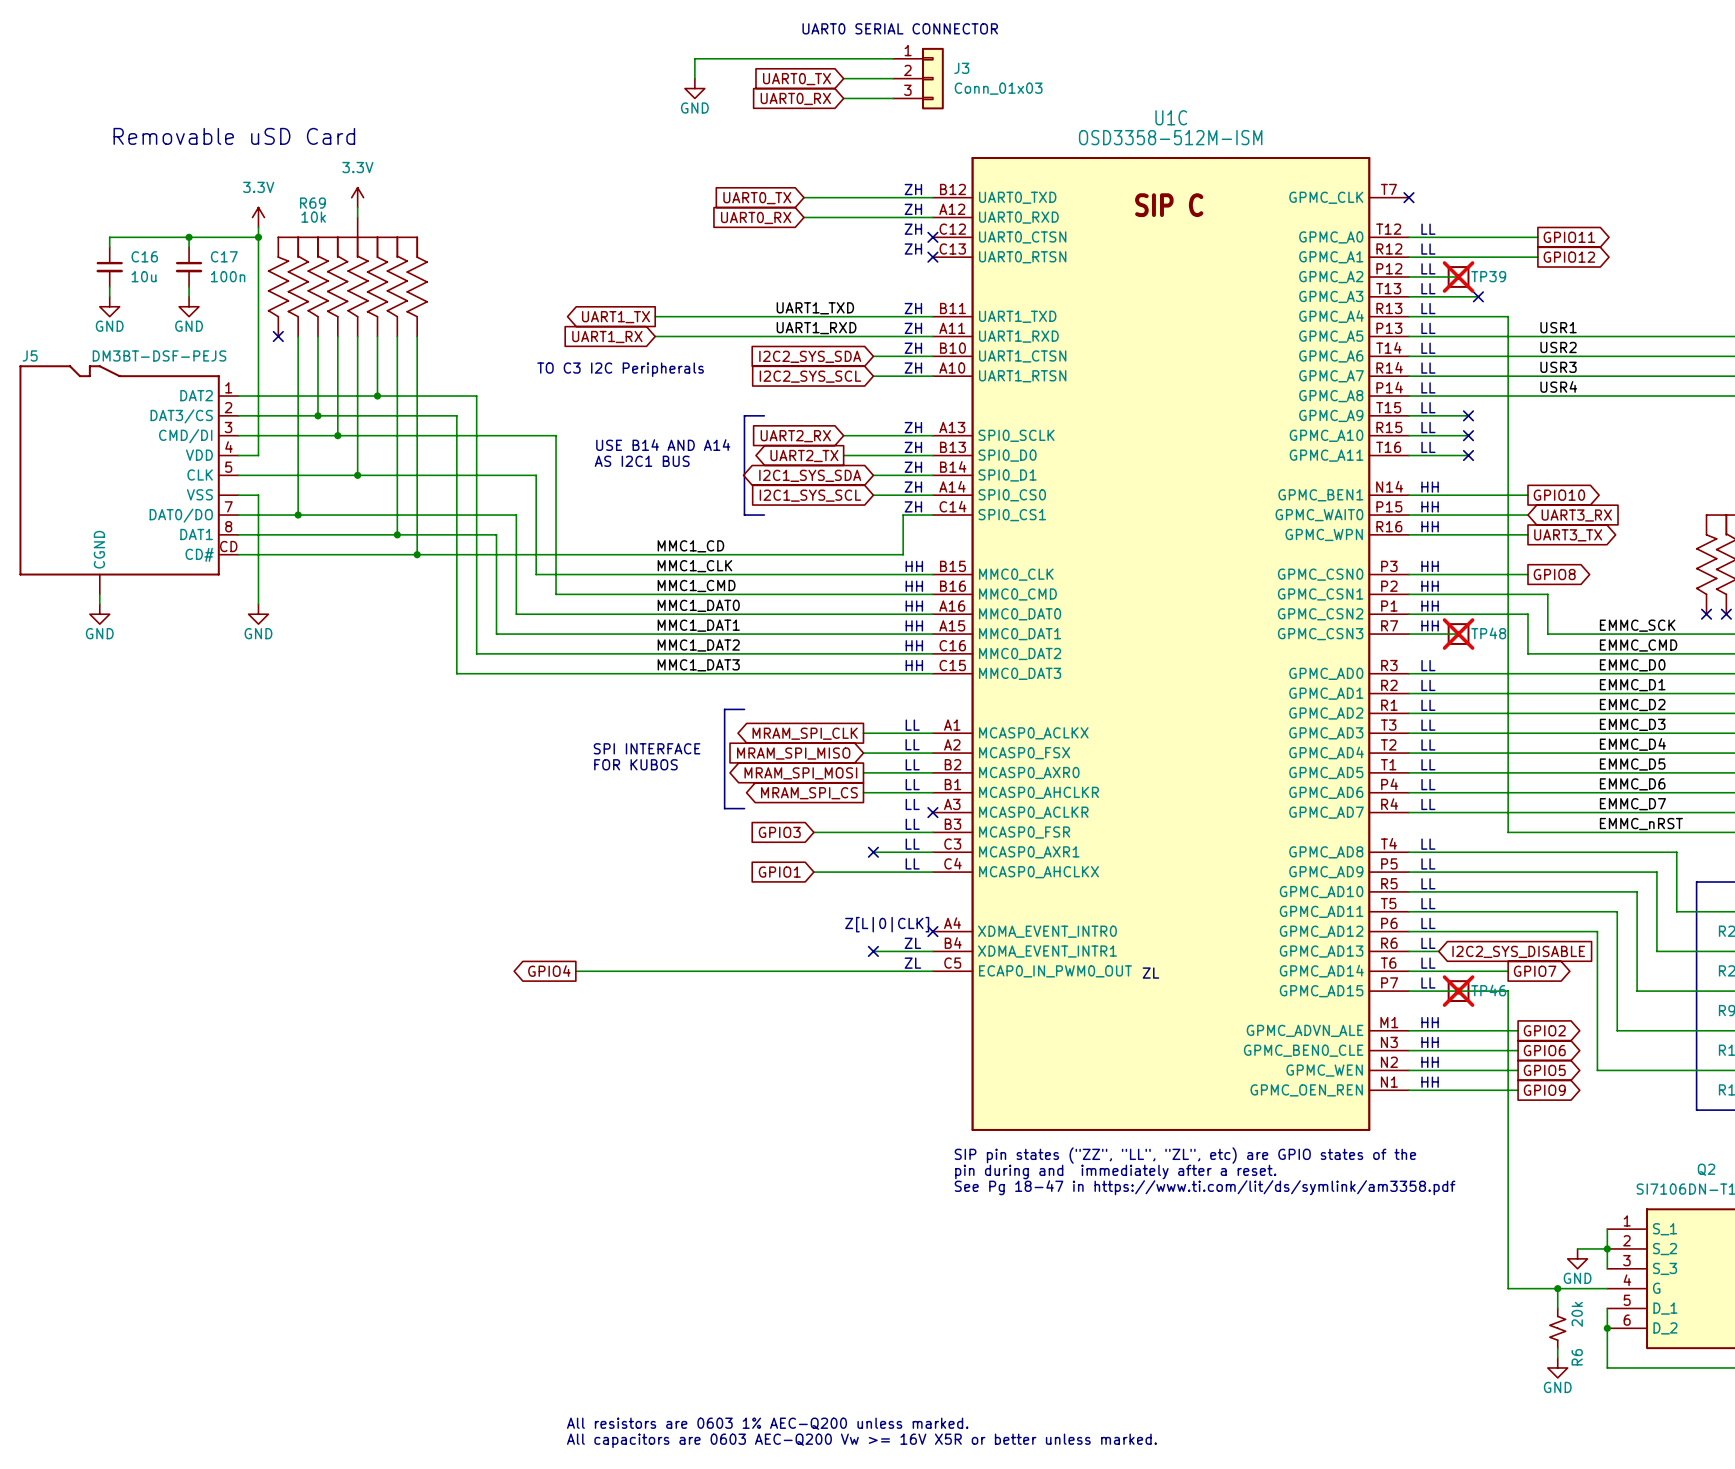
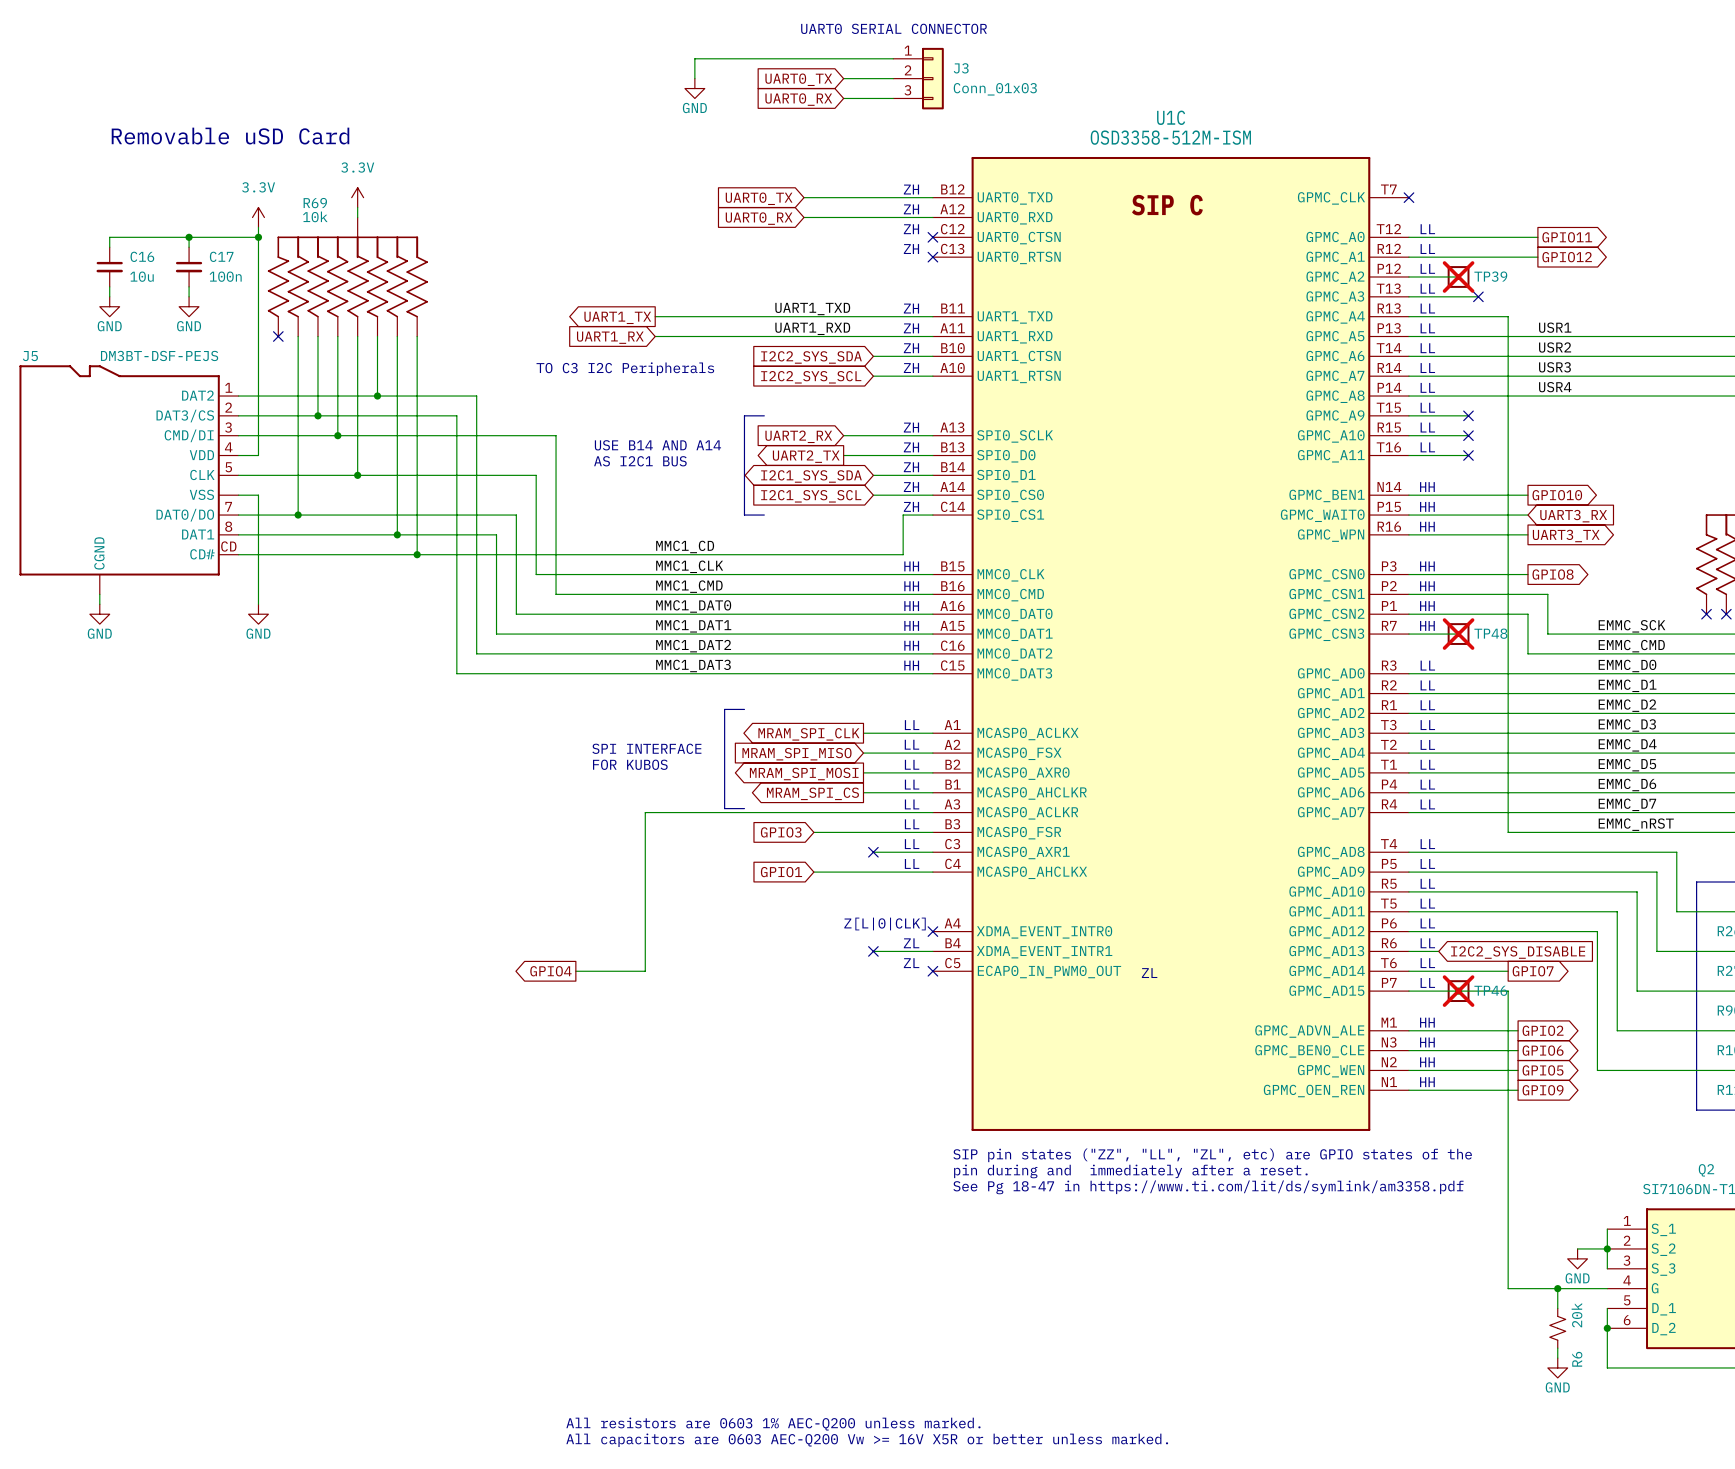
no-connect mark: (932, 812) -> none
wire: (645, 971) (932, 971) -> (645, 971) (645, 812) (932, 812)
no-connect mark: none -> (932, 971)

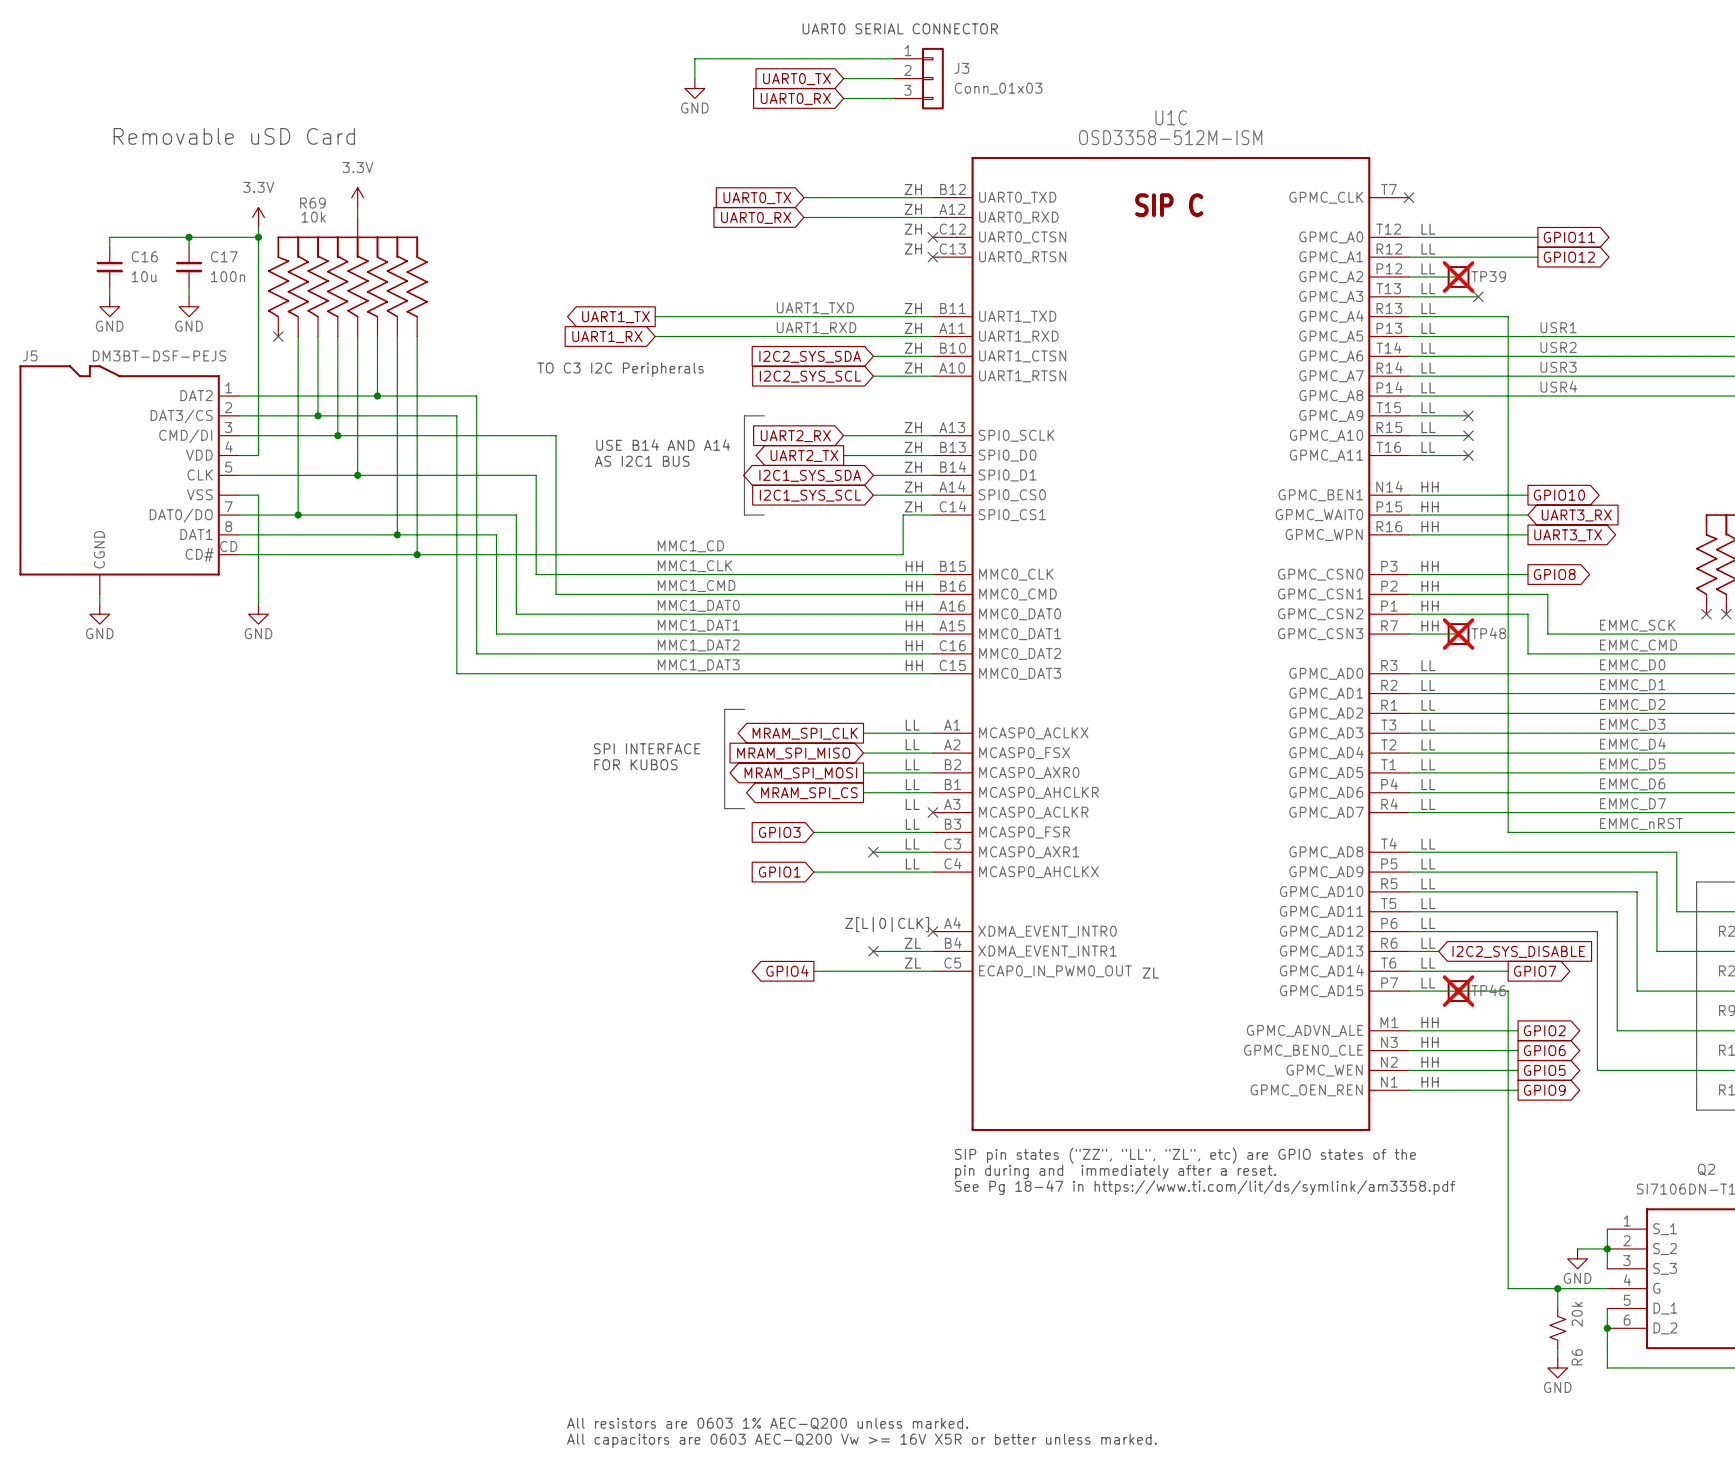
wire: (932, 812) (645, 812) (645, 971) (575, 971) -> none
no-connect mark: none -> (932, 812)
global label: GPIO4 (550, 971) -> none
global label: none -> GPIO4 (787, 971)
wire: none -> (813, 971) (932, 971)
no-connect mark: (932, 971) -> none

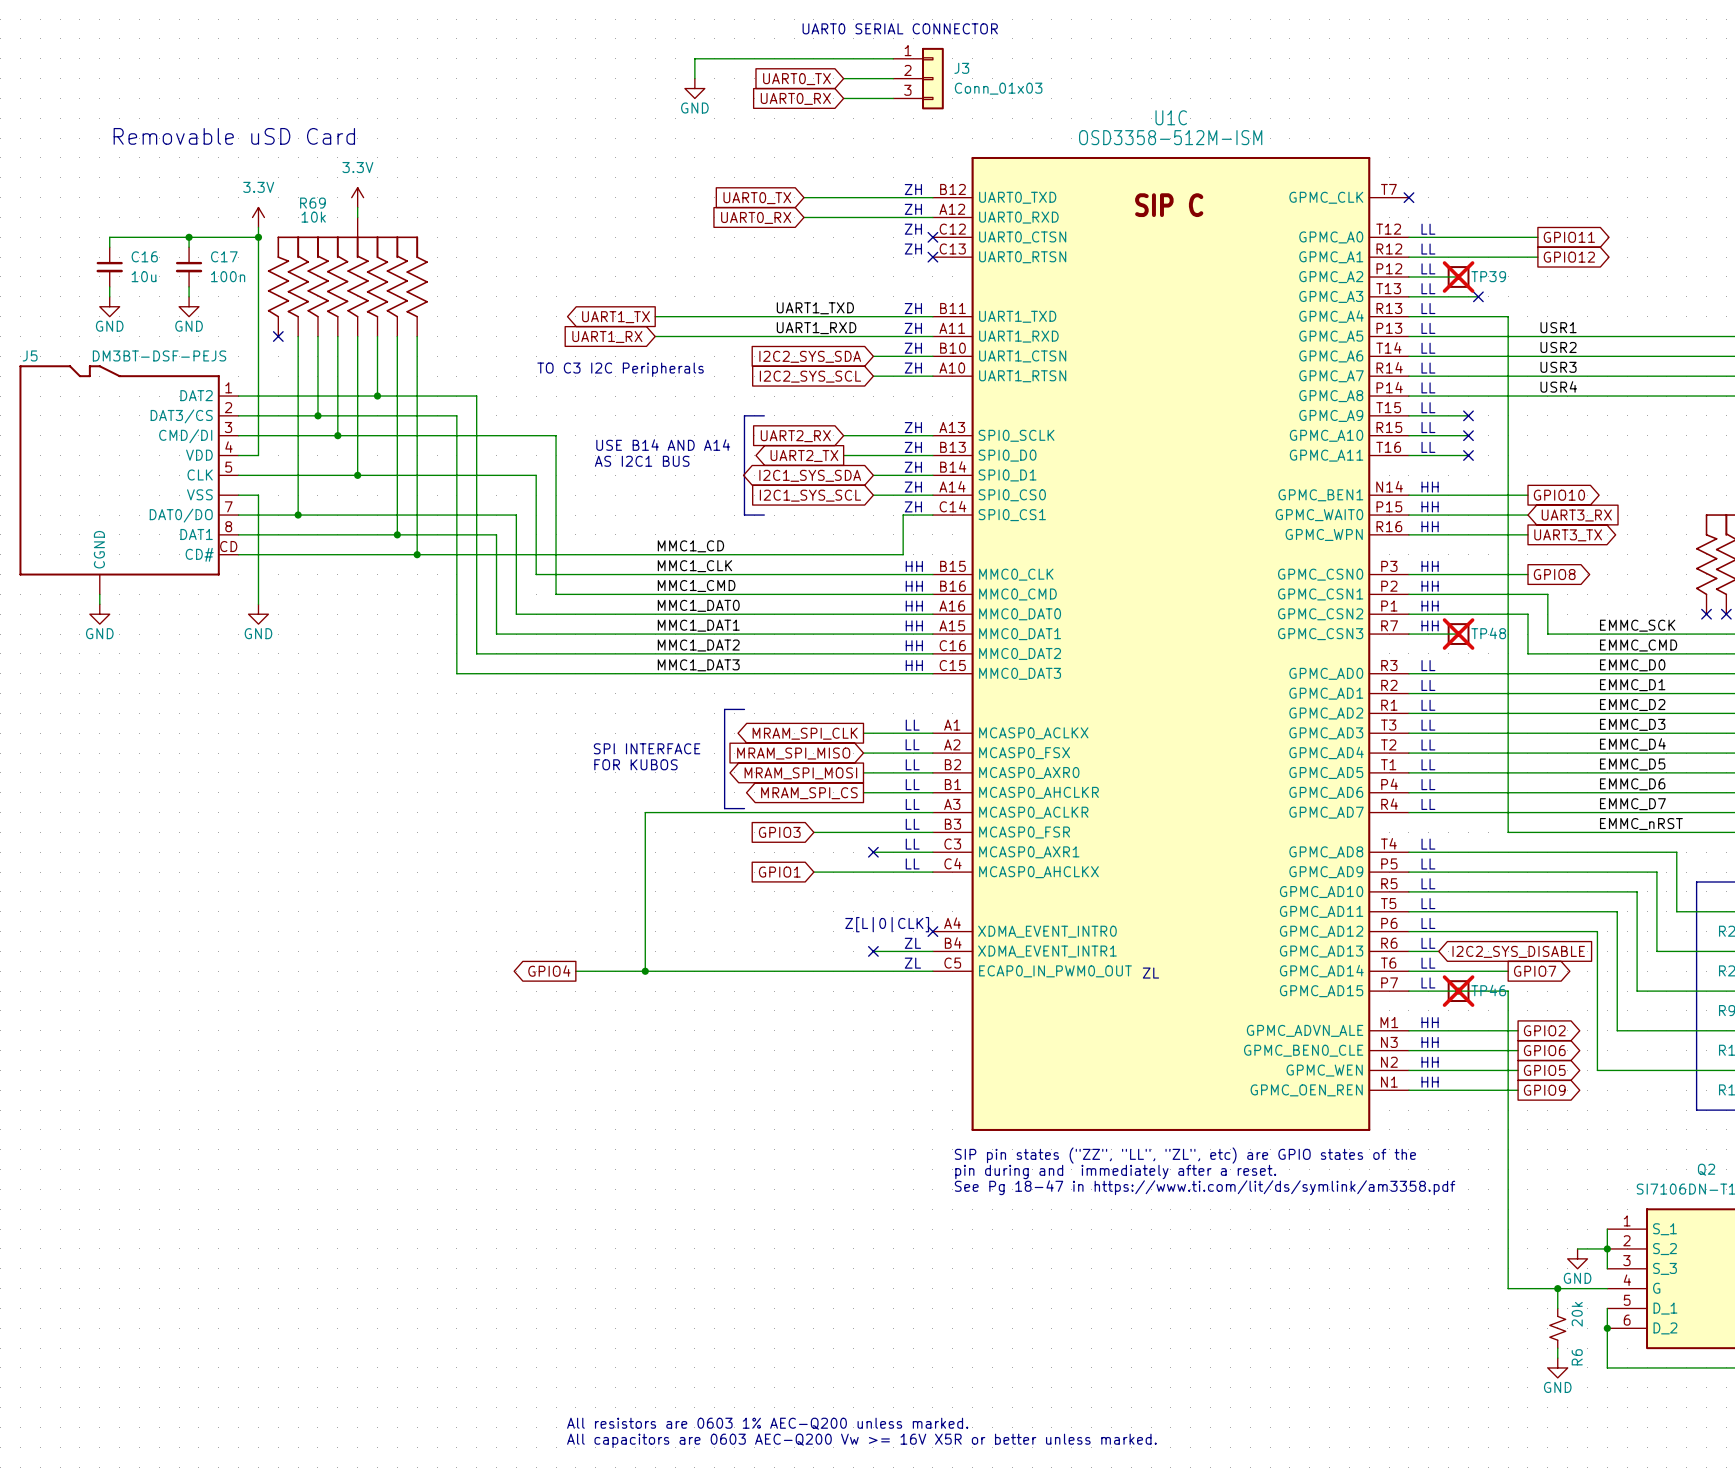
wire: none -> (932, 812) (645, 812) (645, 971)
no-connect mark: (932, 812) -> none
global label: none -> GPIO4 (549, 971)
wire: none -> (575, 971) (813, 971)
junction: none -> (645, 971)
global label: GPIO4 (787, 971) -> none

